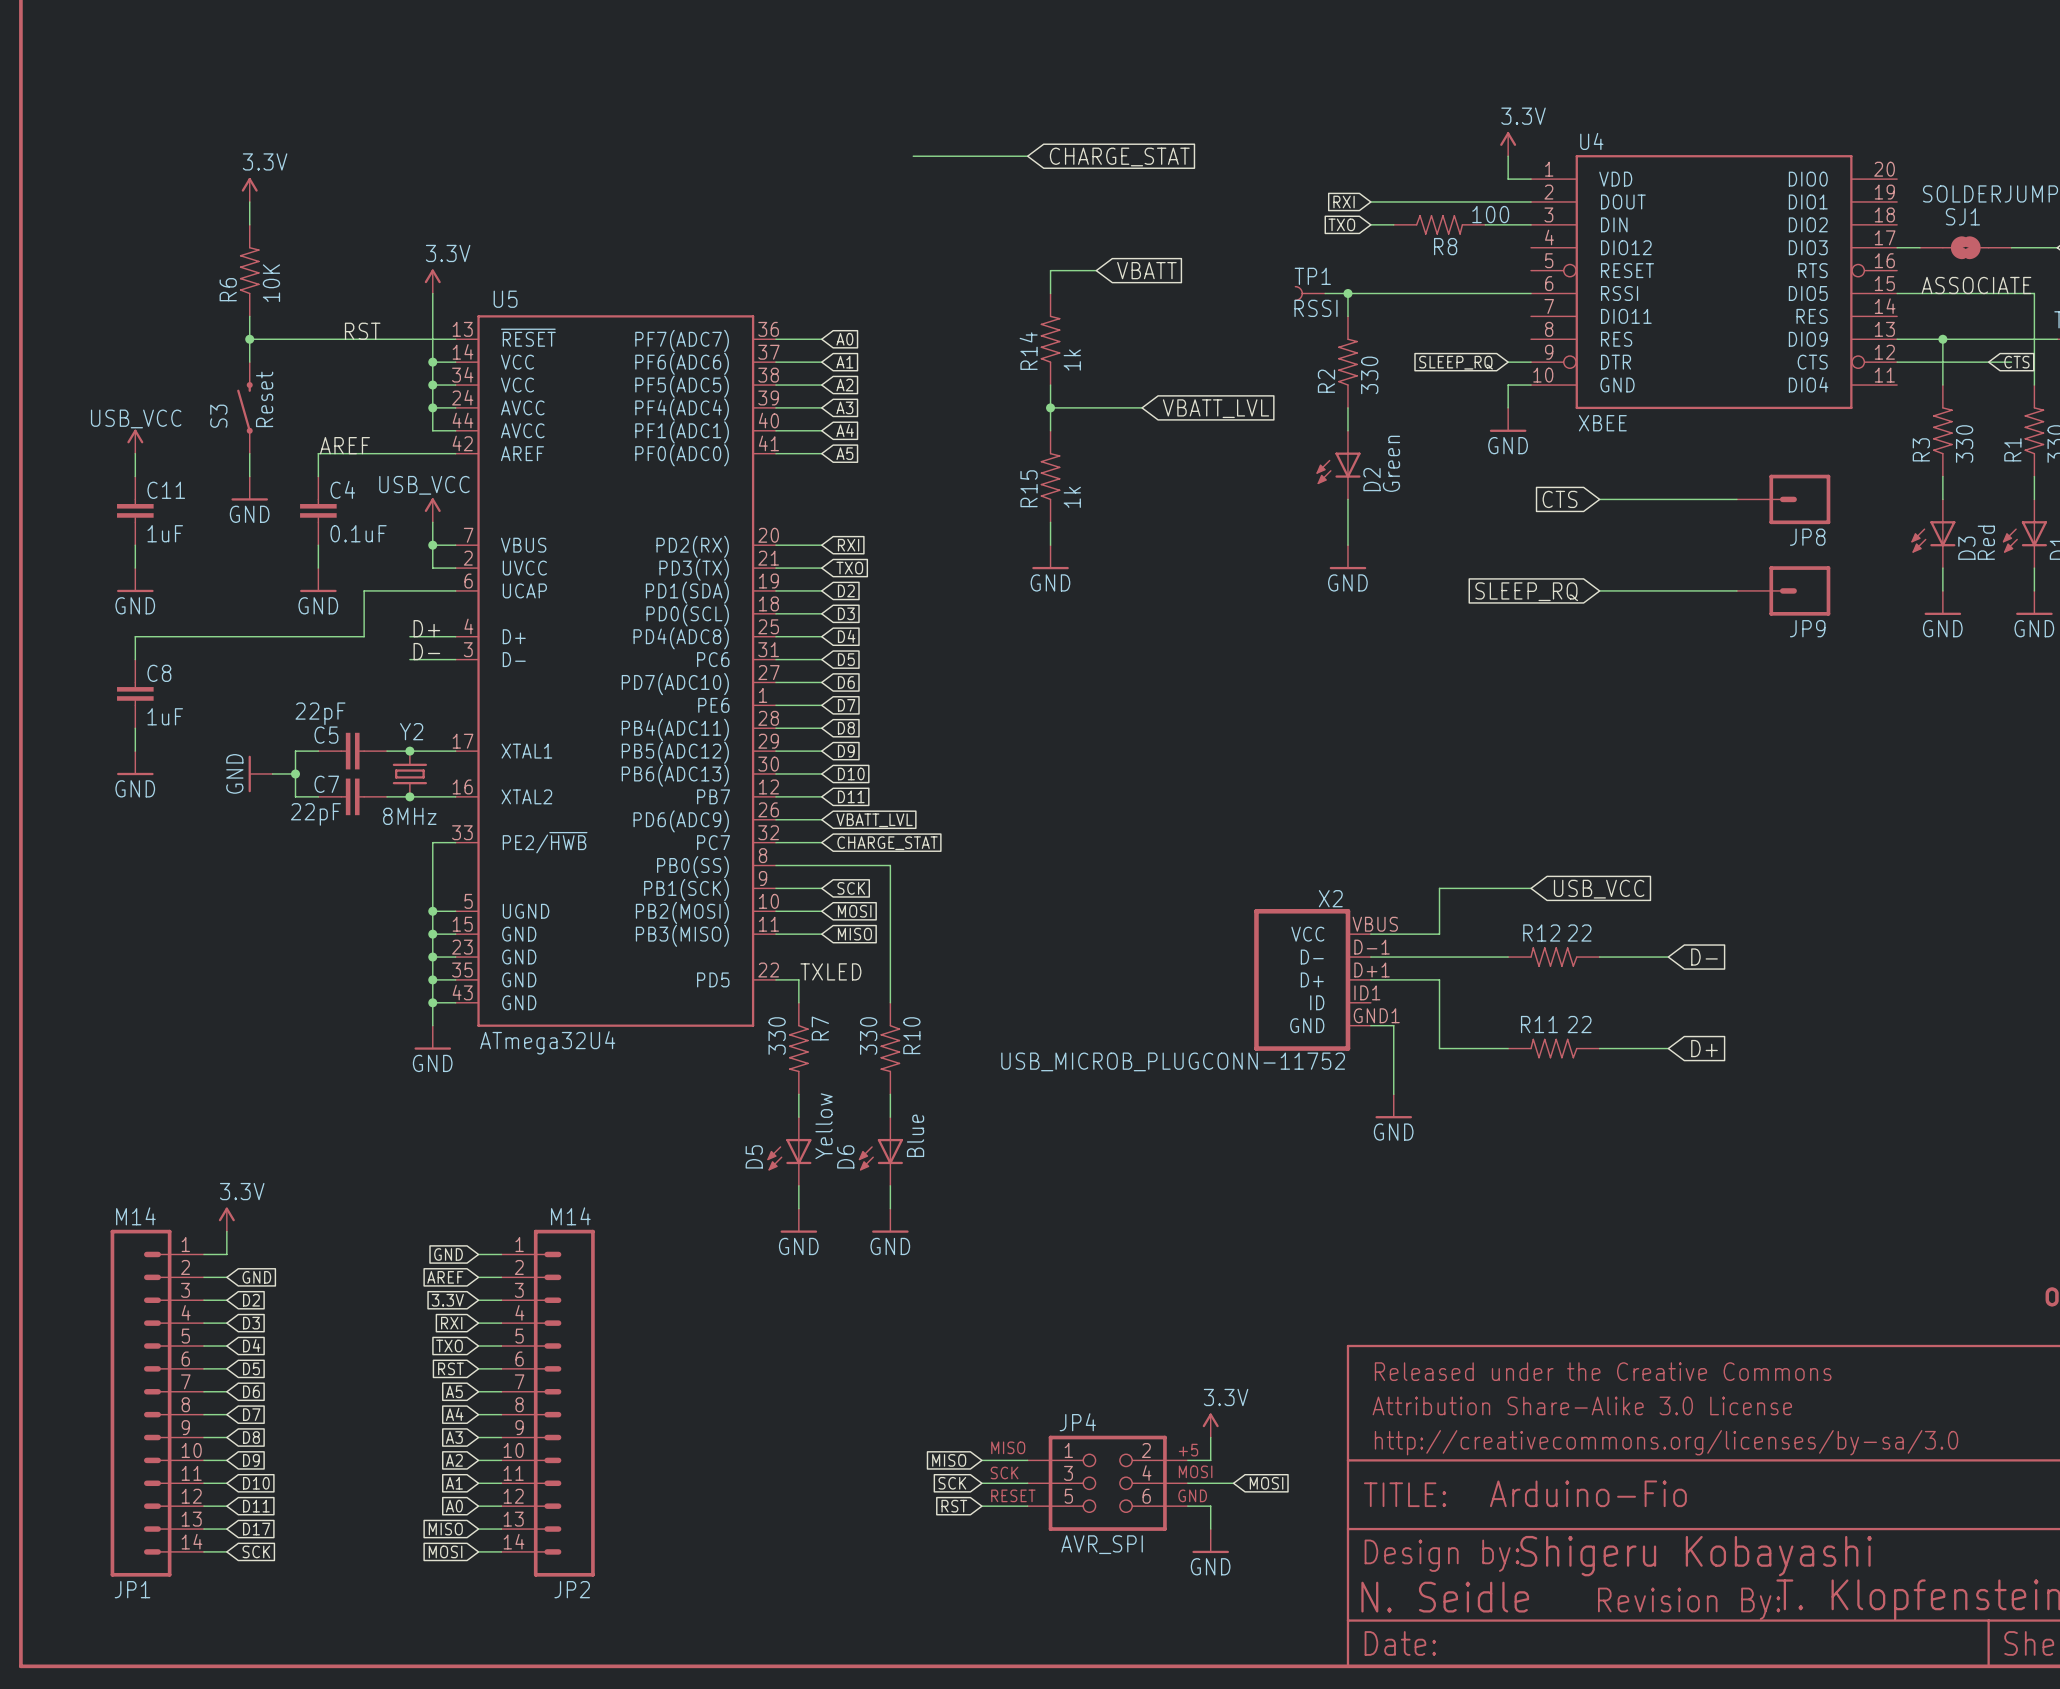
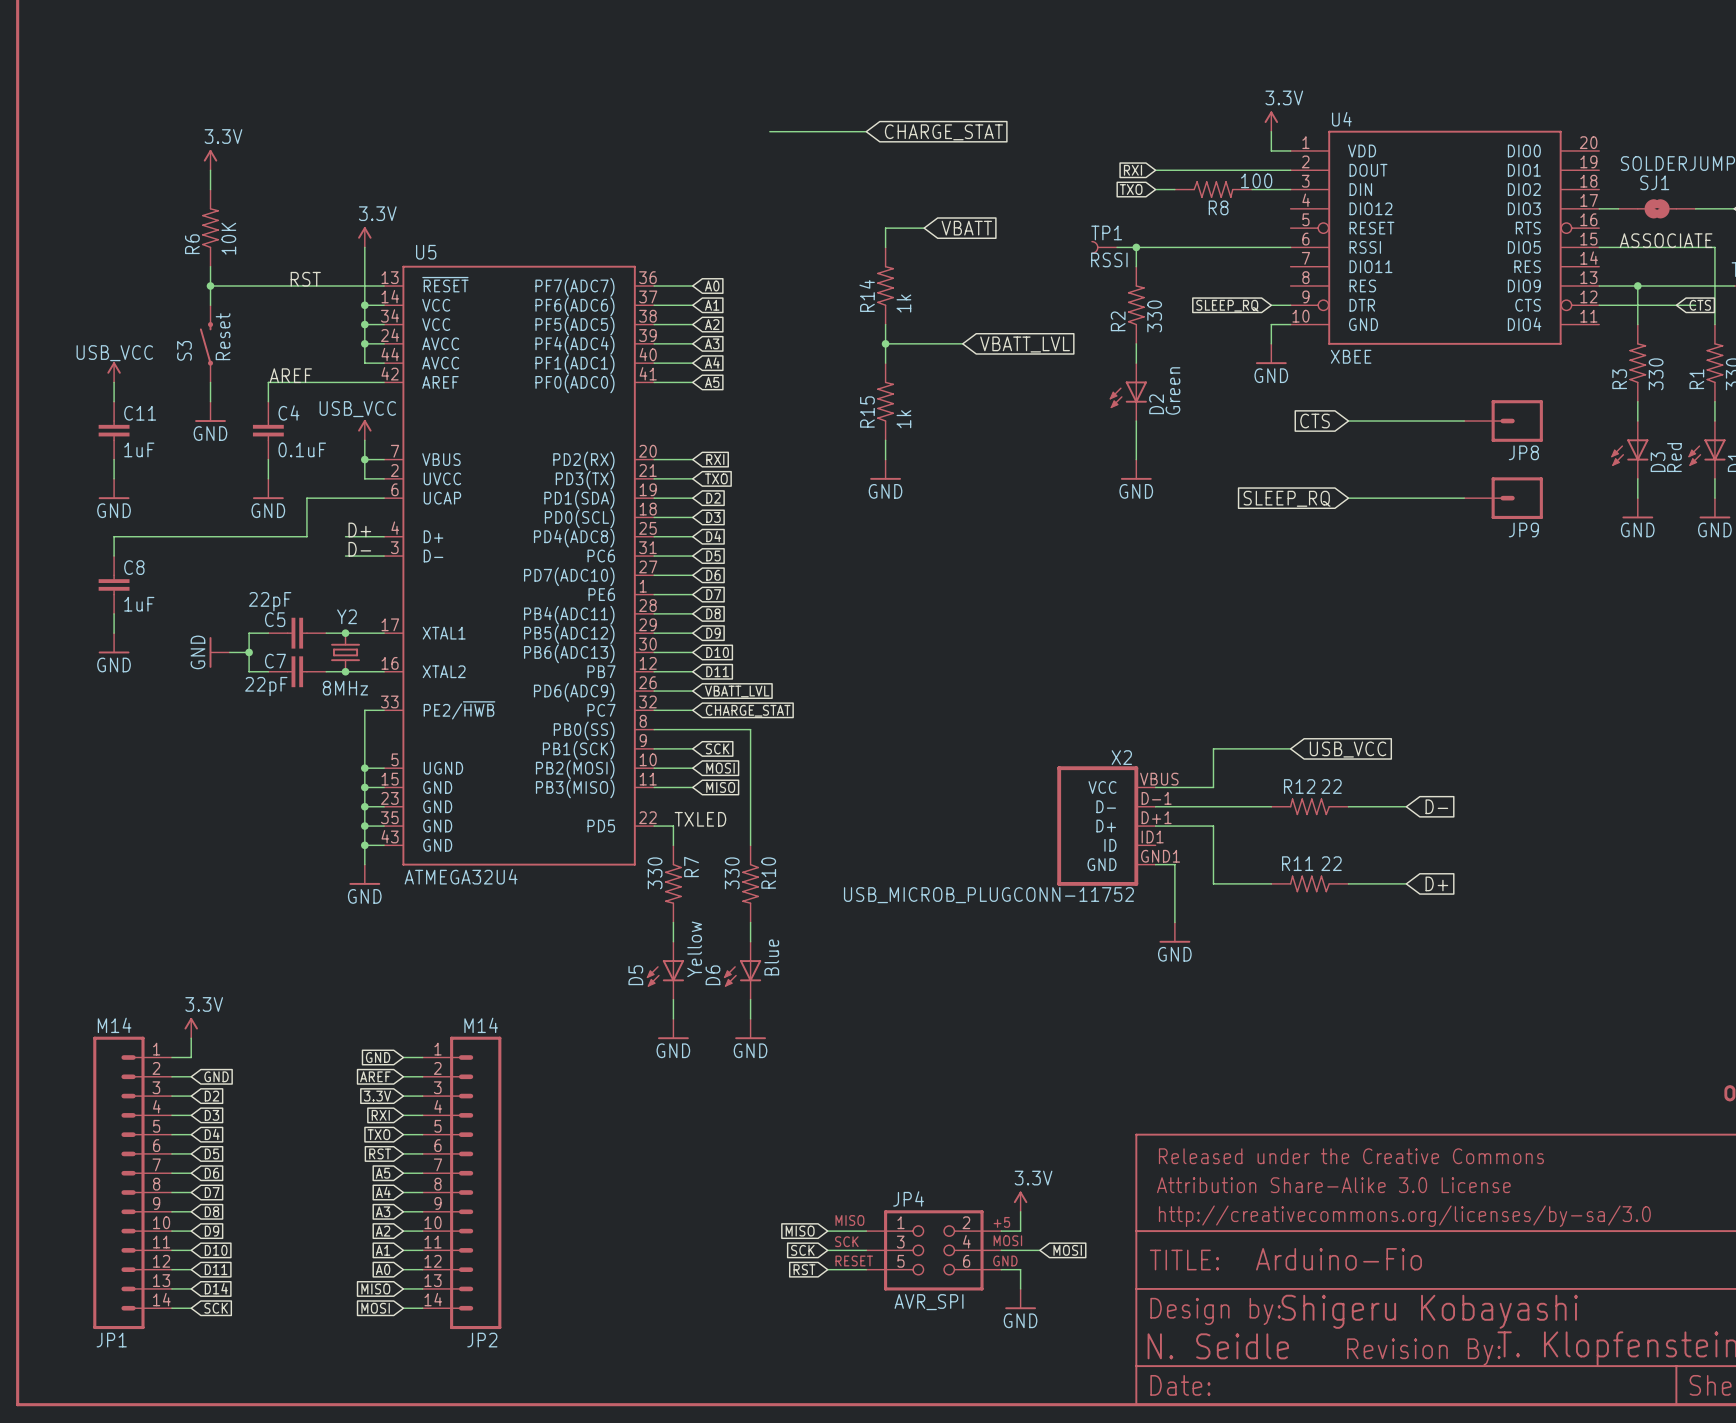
U5 value: ATmega32U4 (547, 1042) -> ATMEGA32U4 (461, 876)
global label: D17 (256, 1529) -> D14 (216, 1288)

